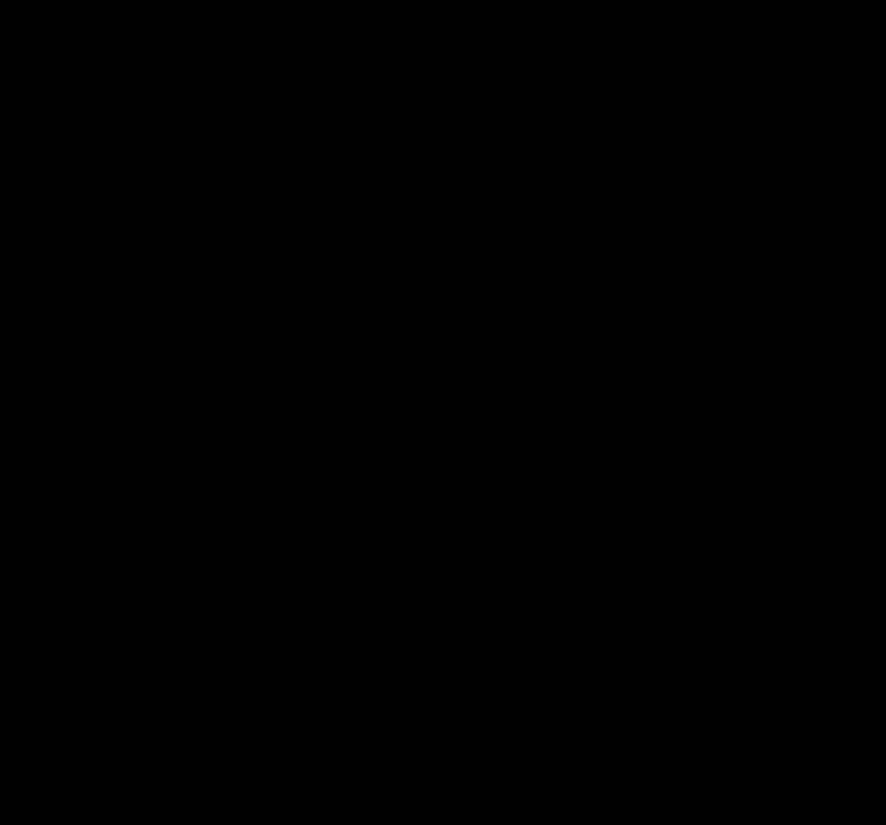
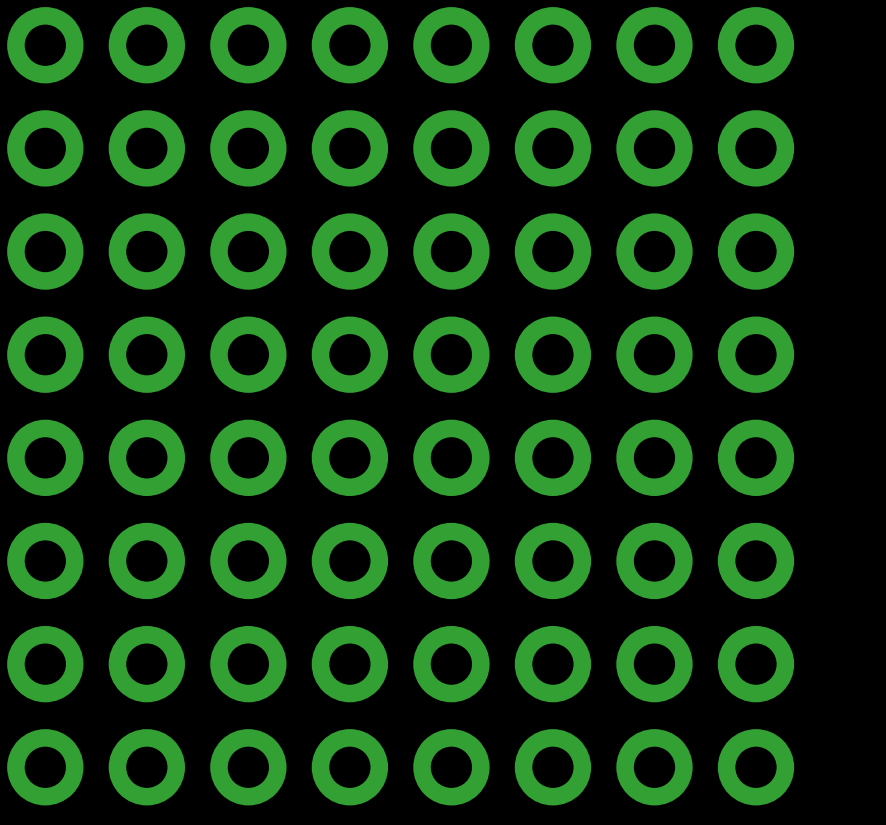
part: none -> (45, 406)
part: none -> (146, 406)
part: none -> (248, 406)
part: none -> (349, 406)
part: none -> (451, 406)
part: none -> (552, 406)
part: none -> (654, 406)
part: none -> (756, 406)

